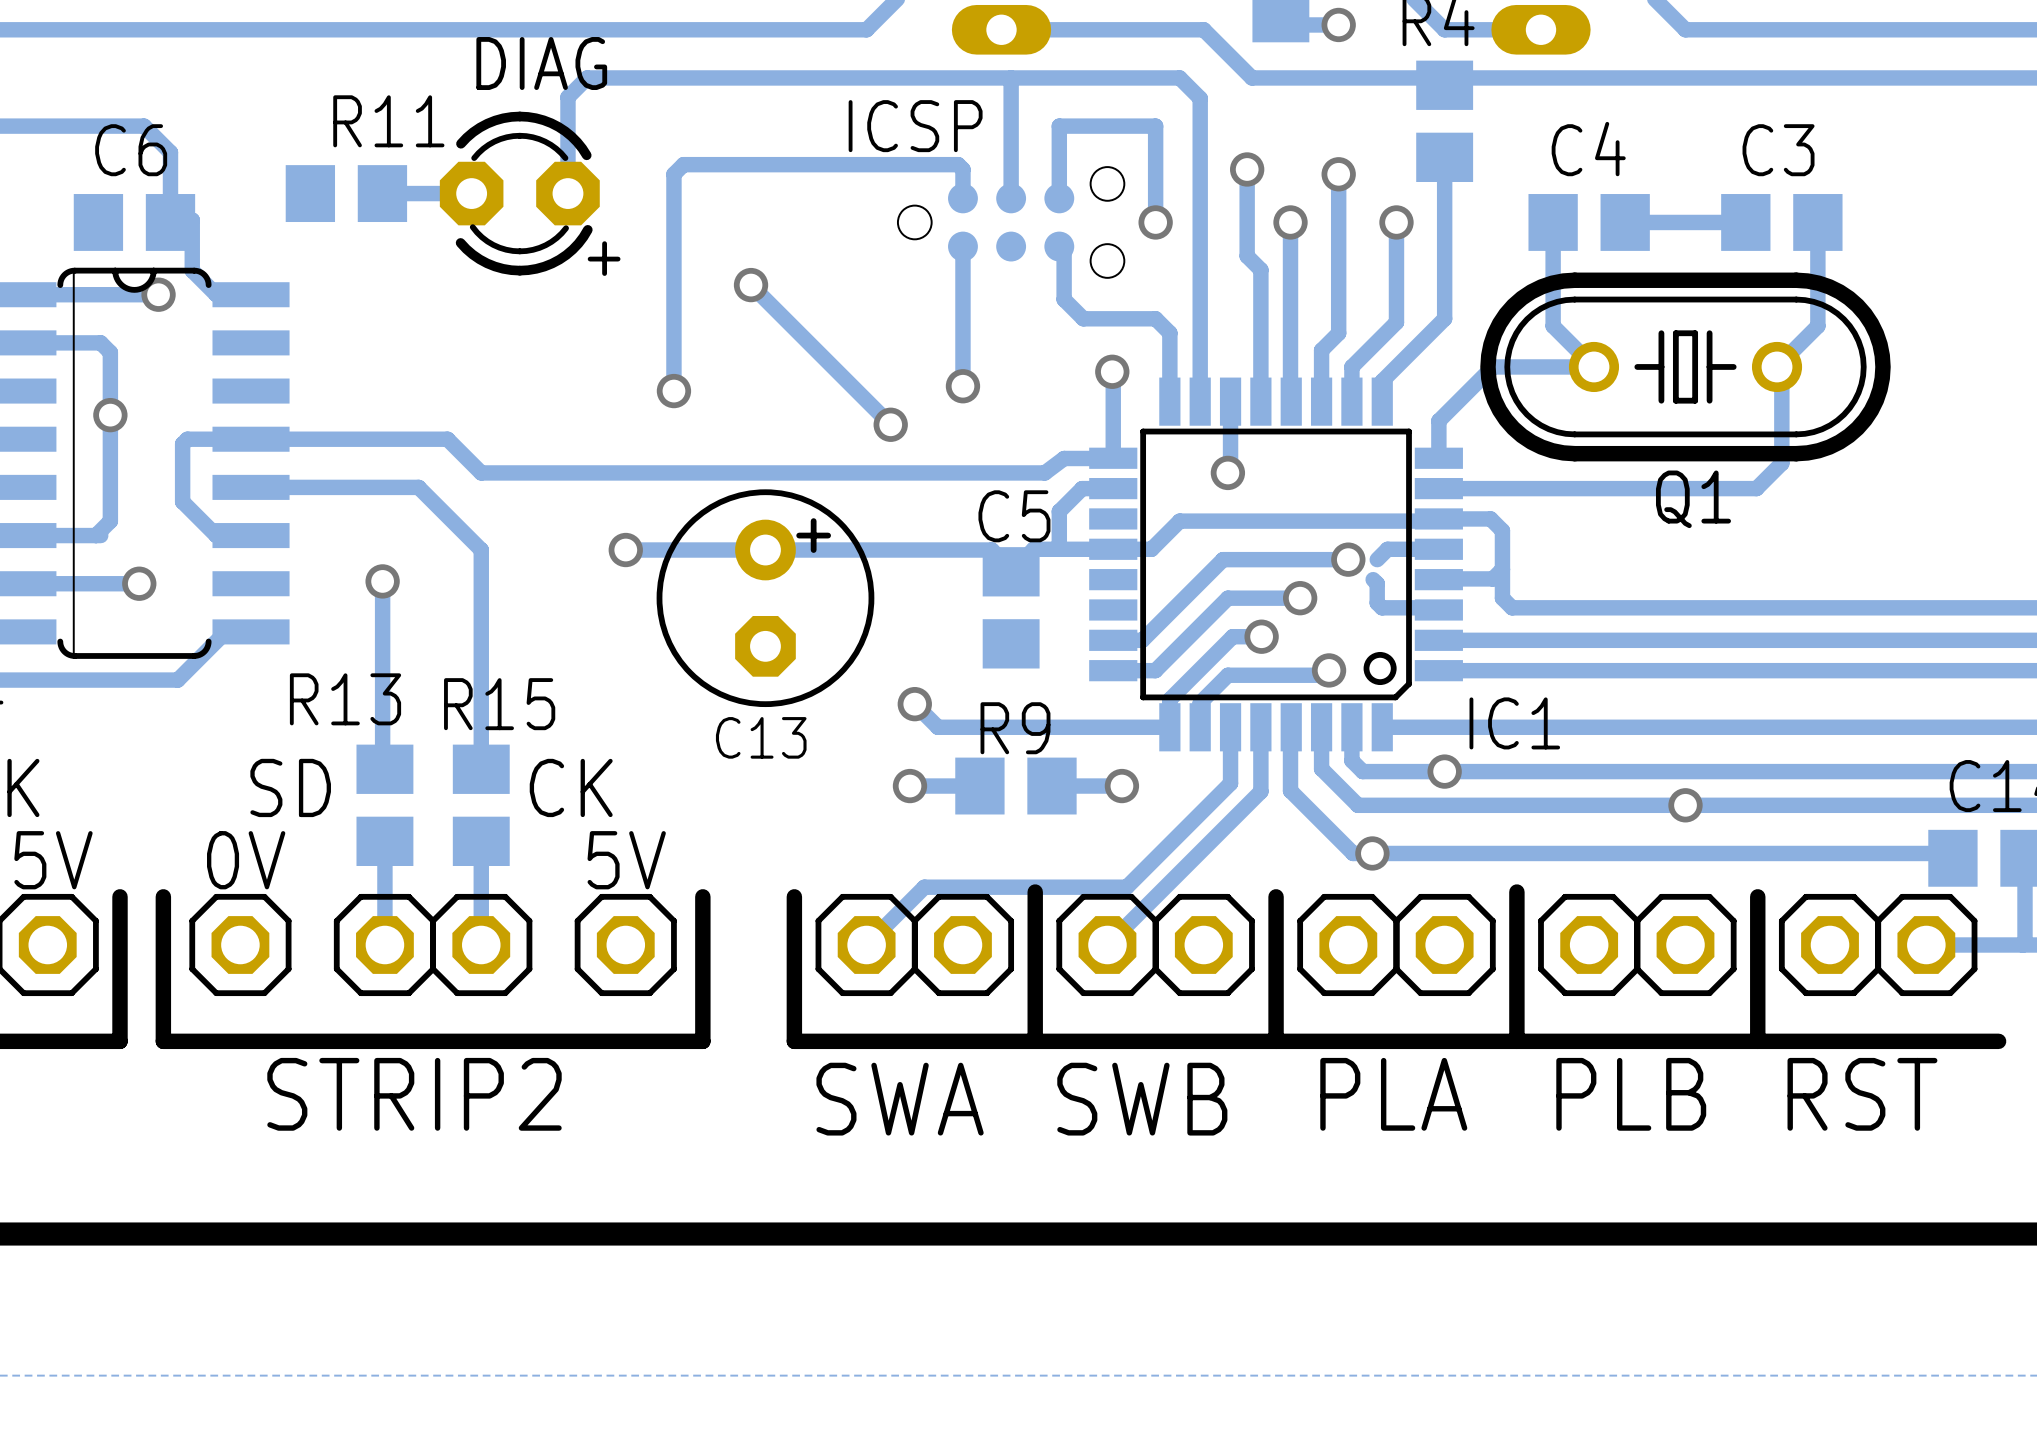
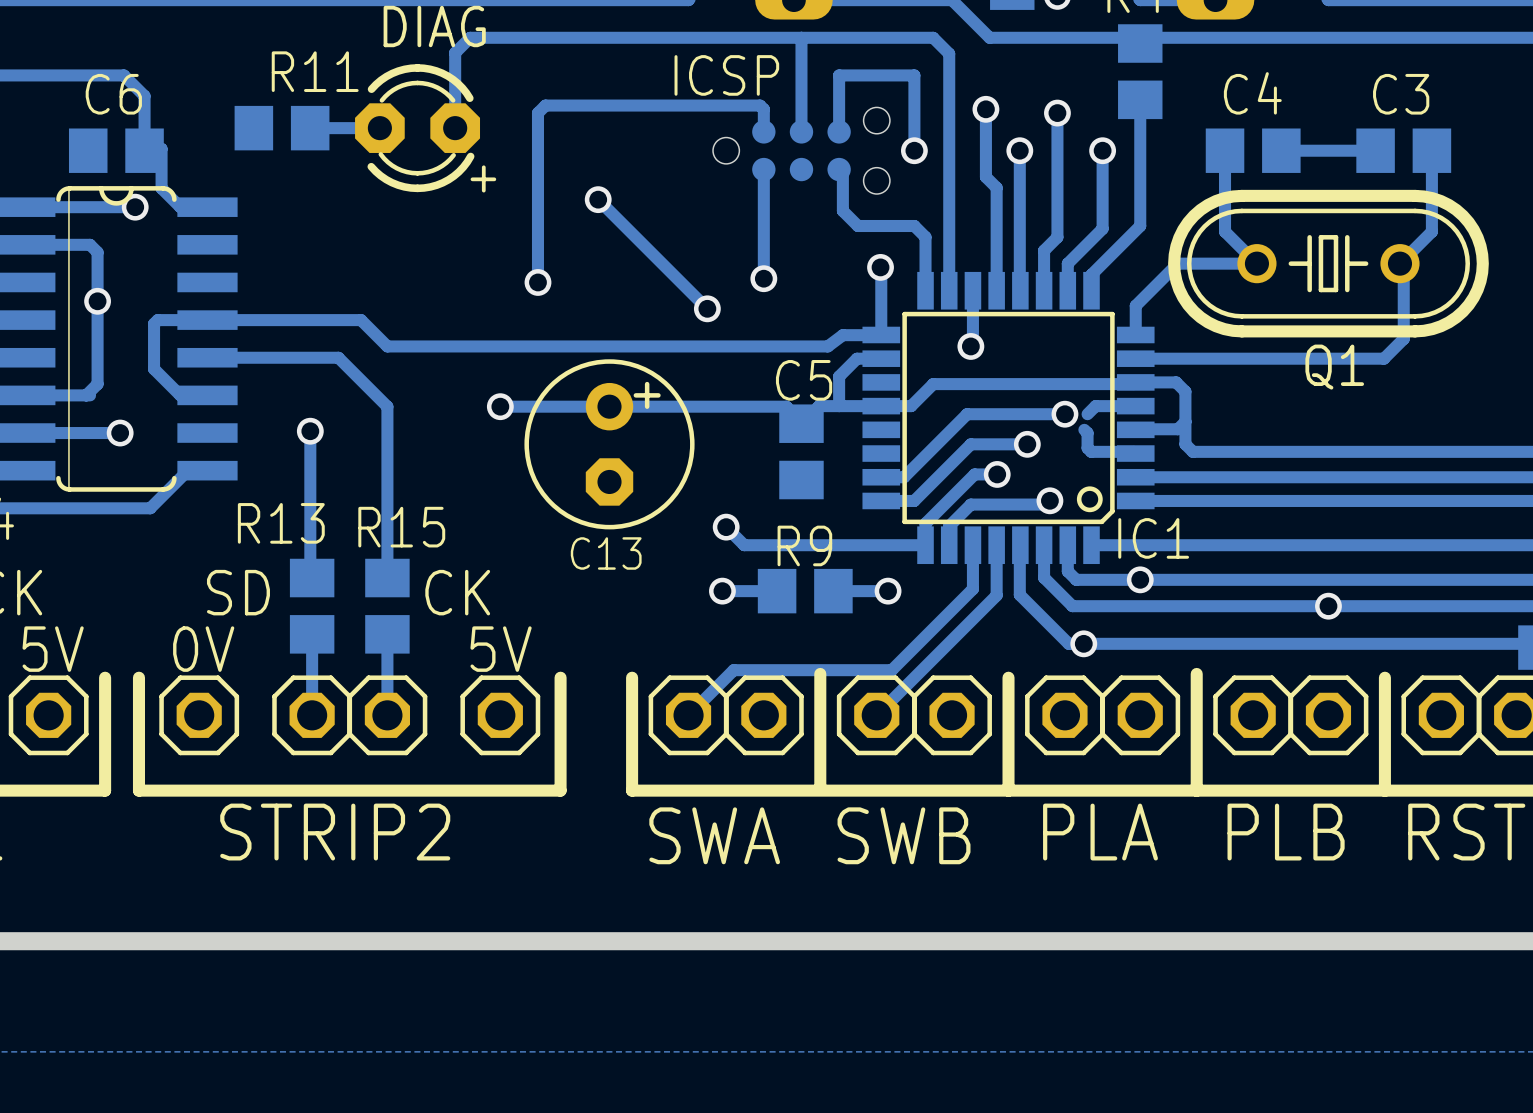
IC1 name position: IC1 (1514, 723) -> IC1 (1153, 538)

